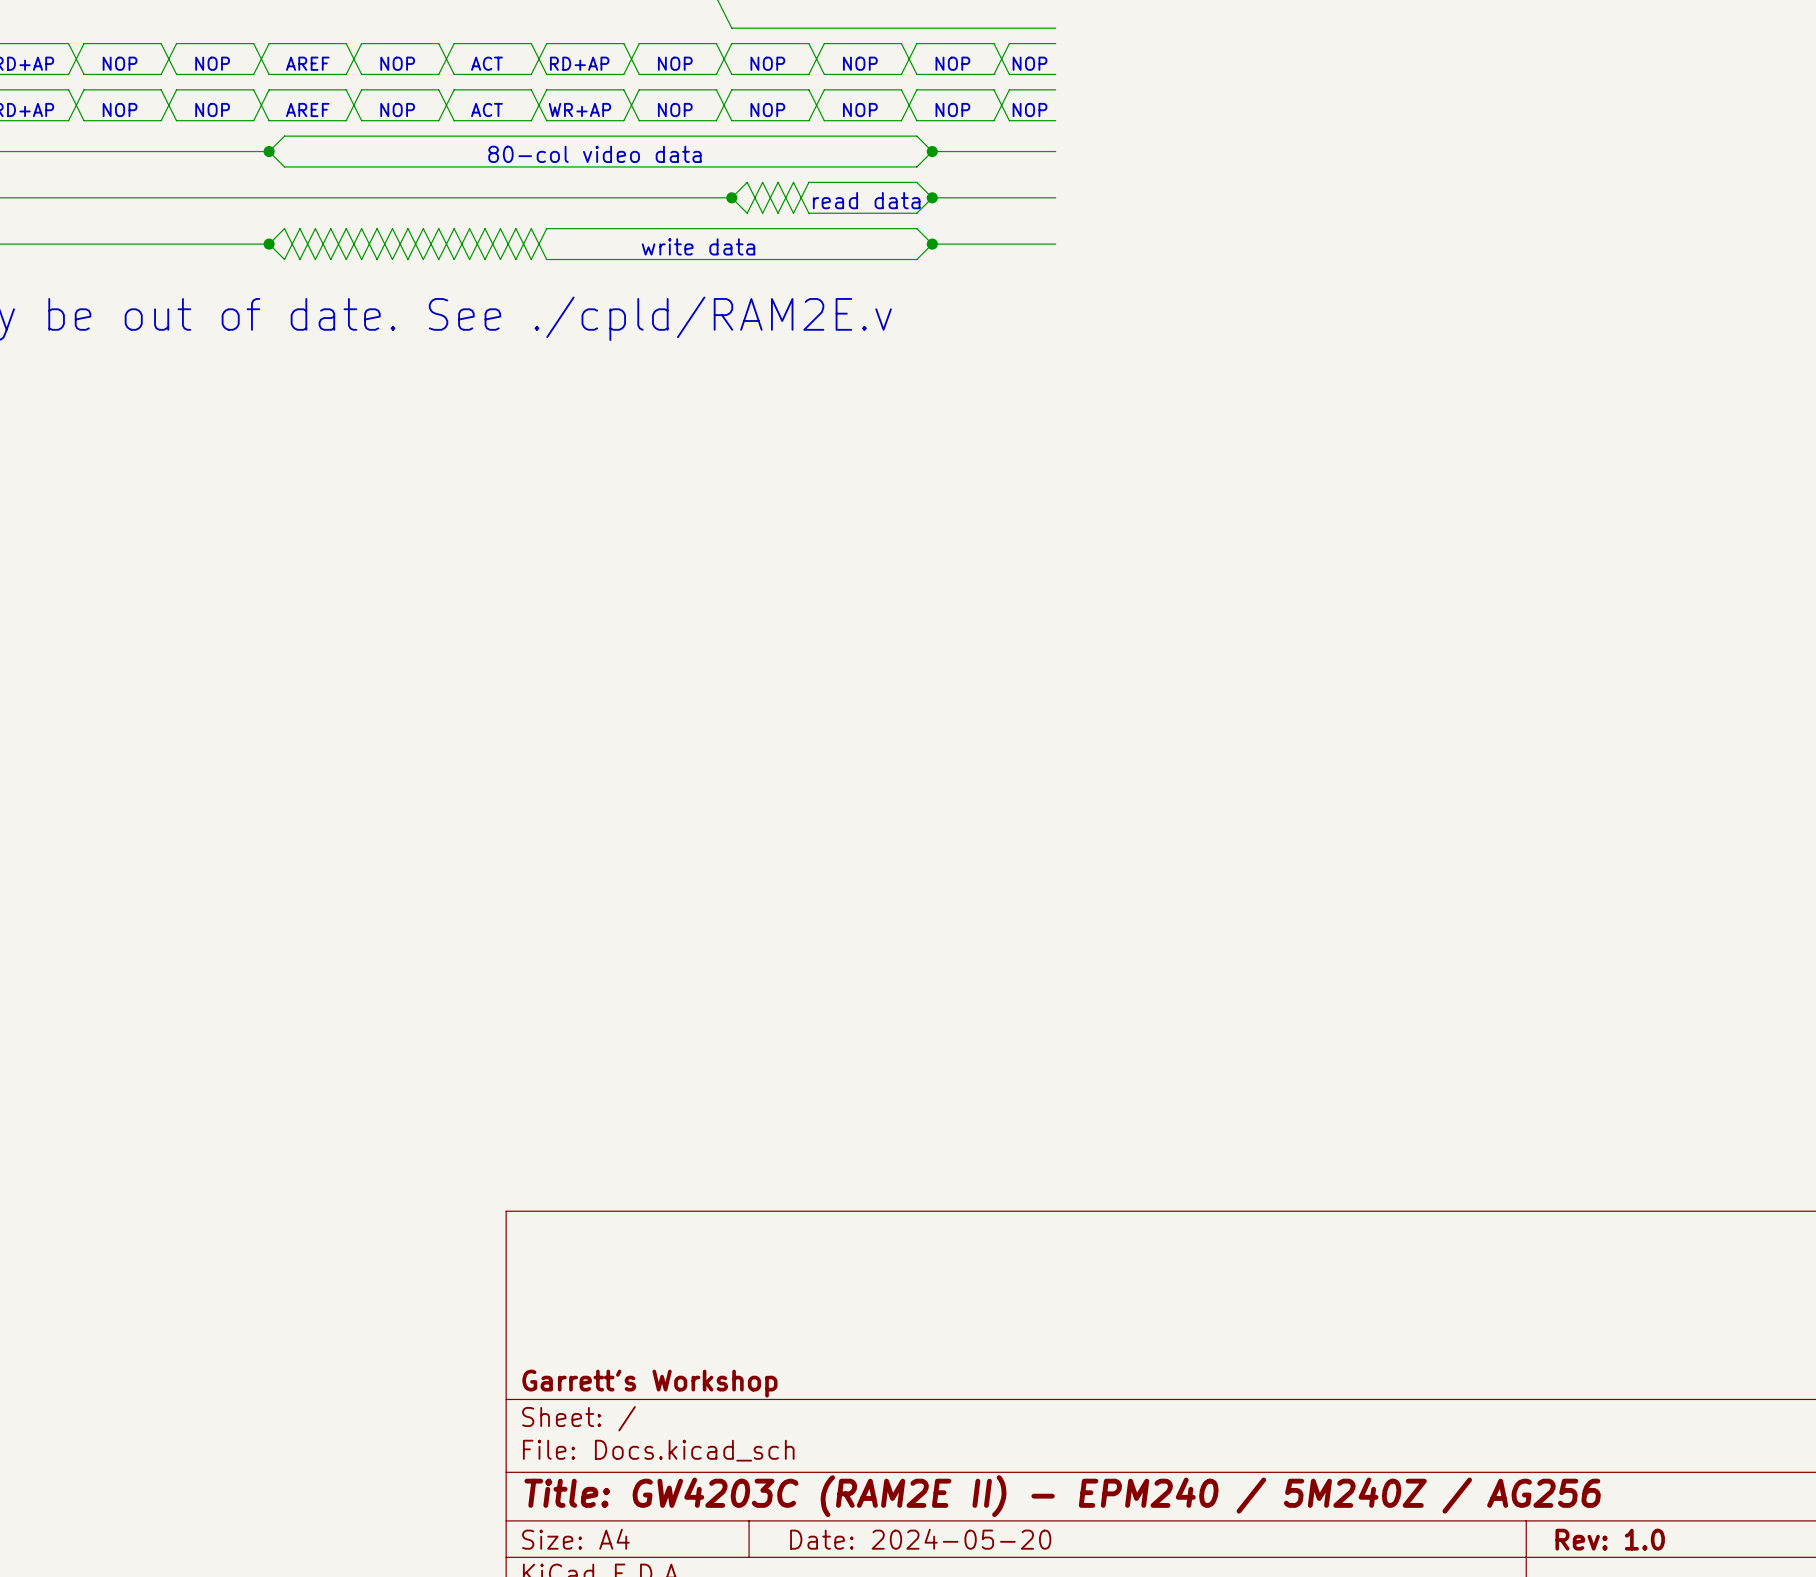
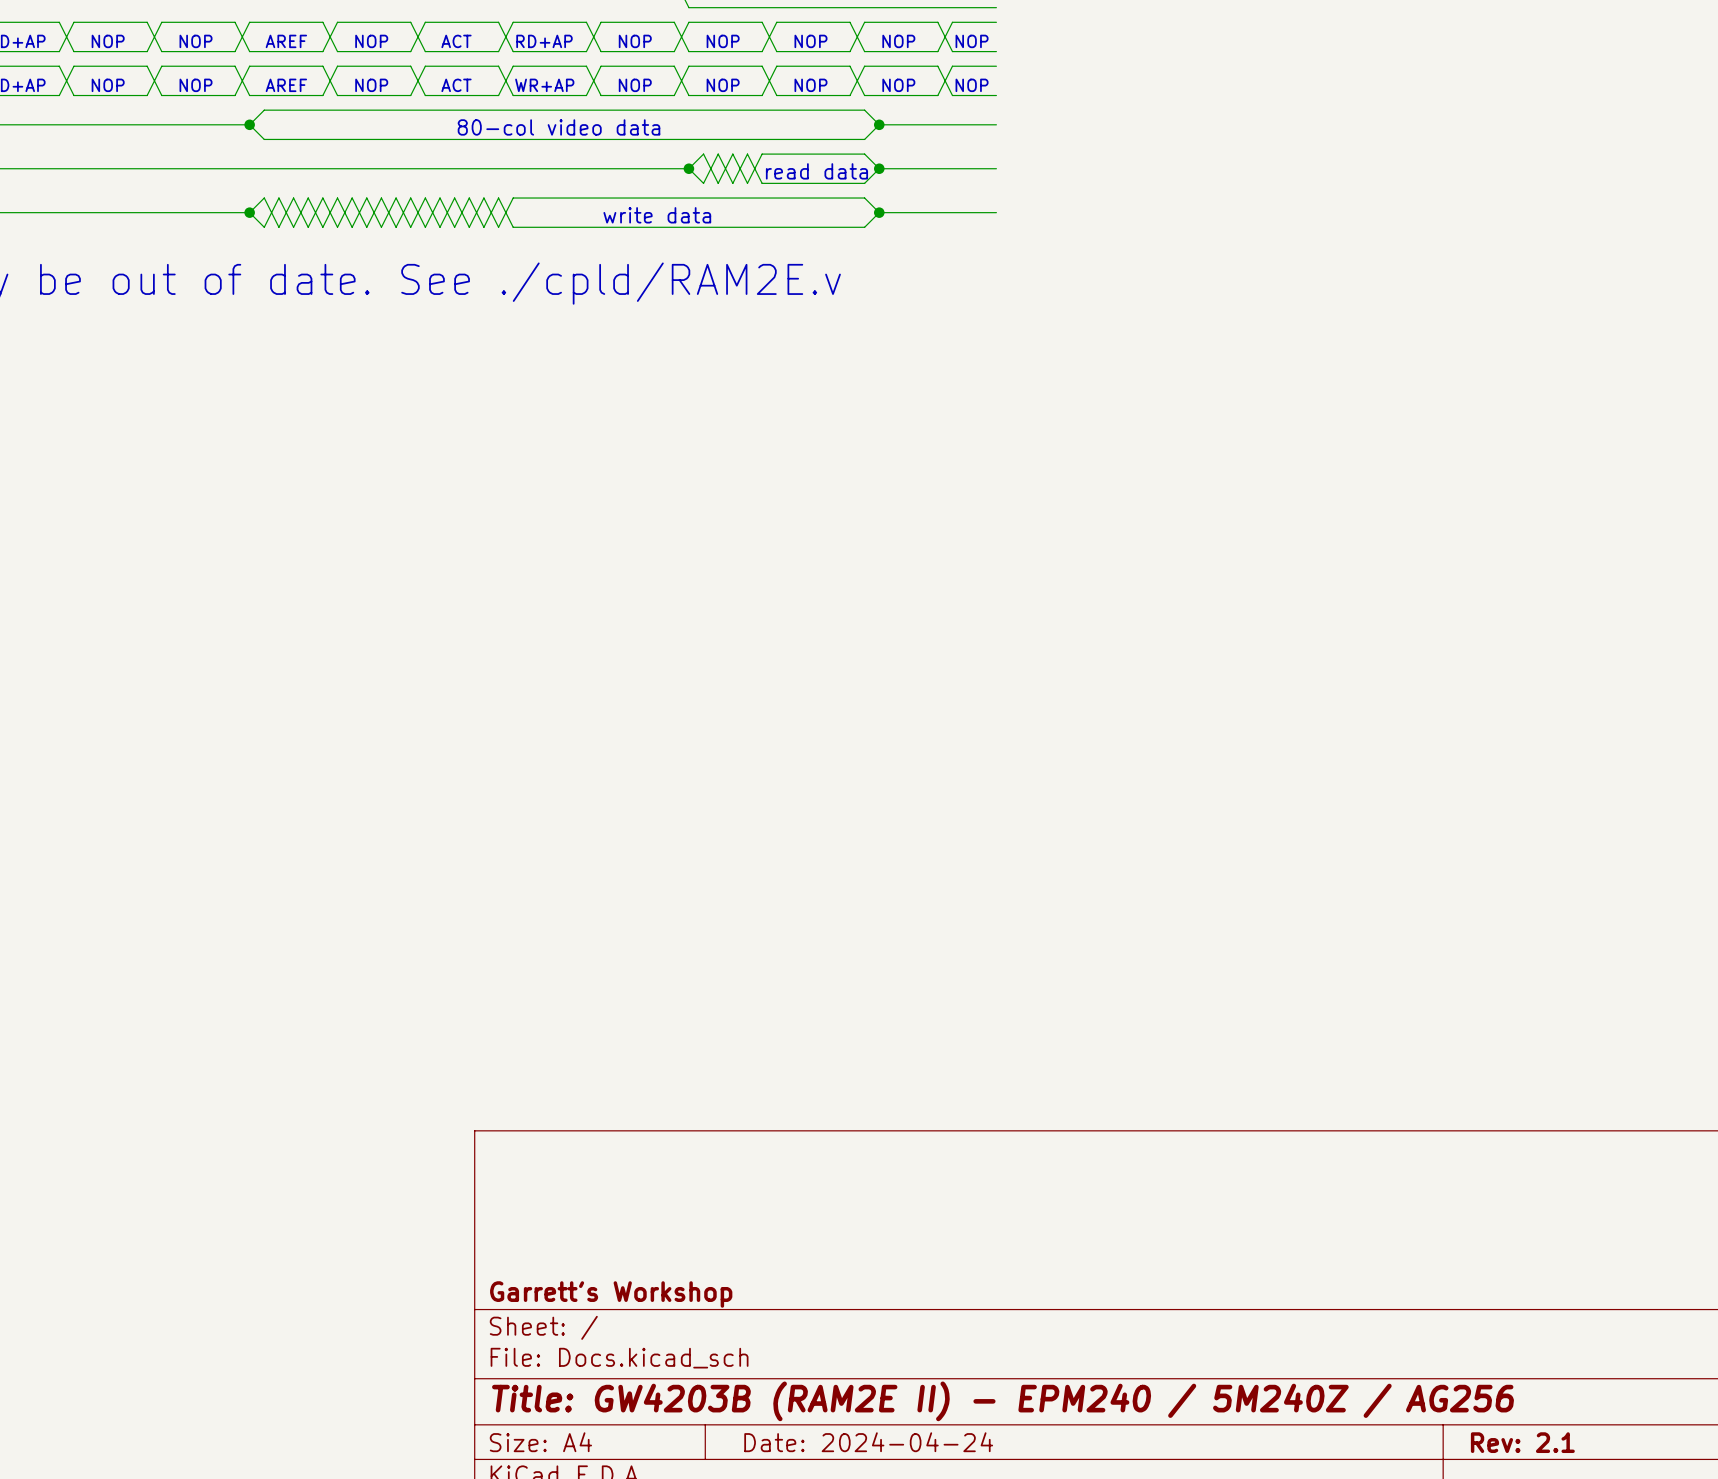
title block: Title: GW4203C (RAM2E II) - EPM240 / 5M240Z / AG256 (1062, 1496) -> Title: GW4203B (RAM2E II) - EPM240 / 5M240Z / AG256 (1003, 1401)
title block: Date: 2024-05-20 (920, 1539) -> Date: 2024-04-24 (868, 1442)
title block: Rev: 1.0 (1610, 1539) -> Rev: 2.1 (1522, 1442)

